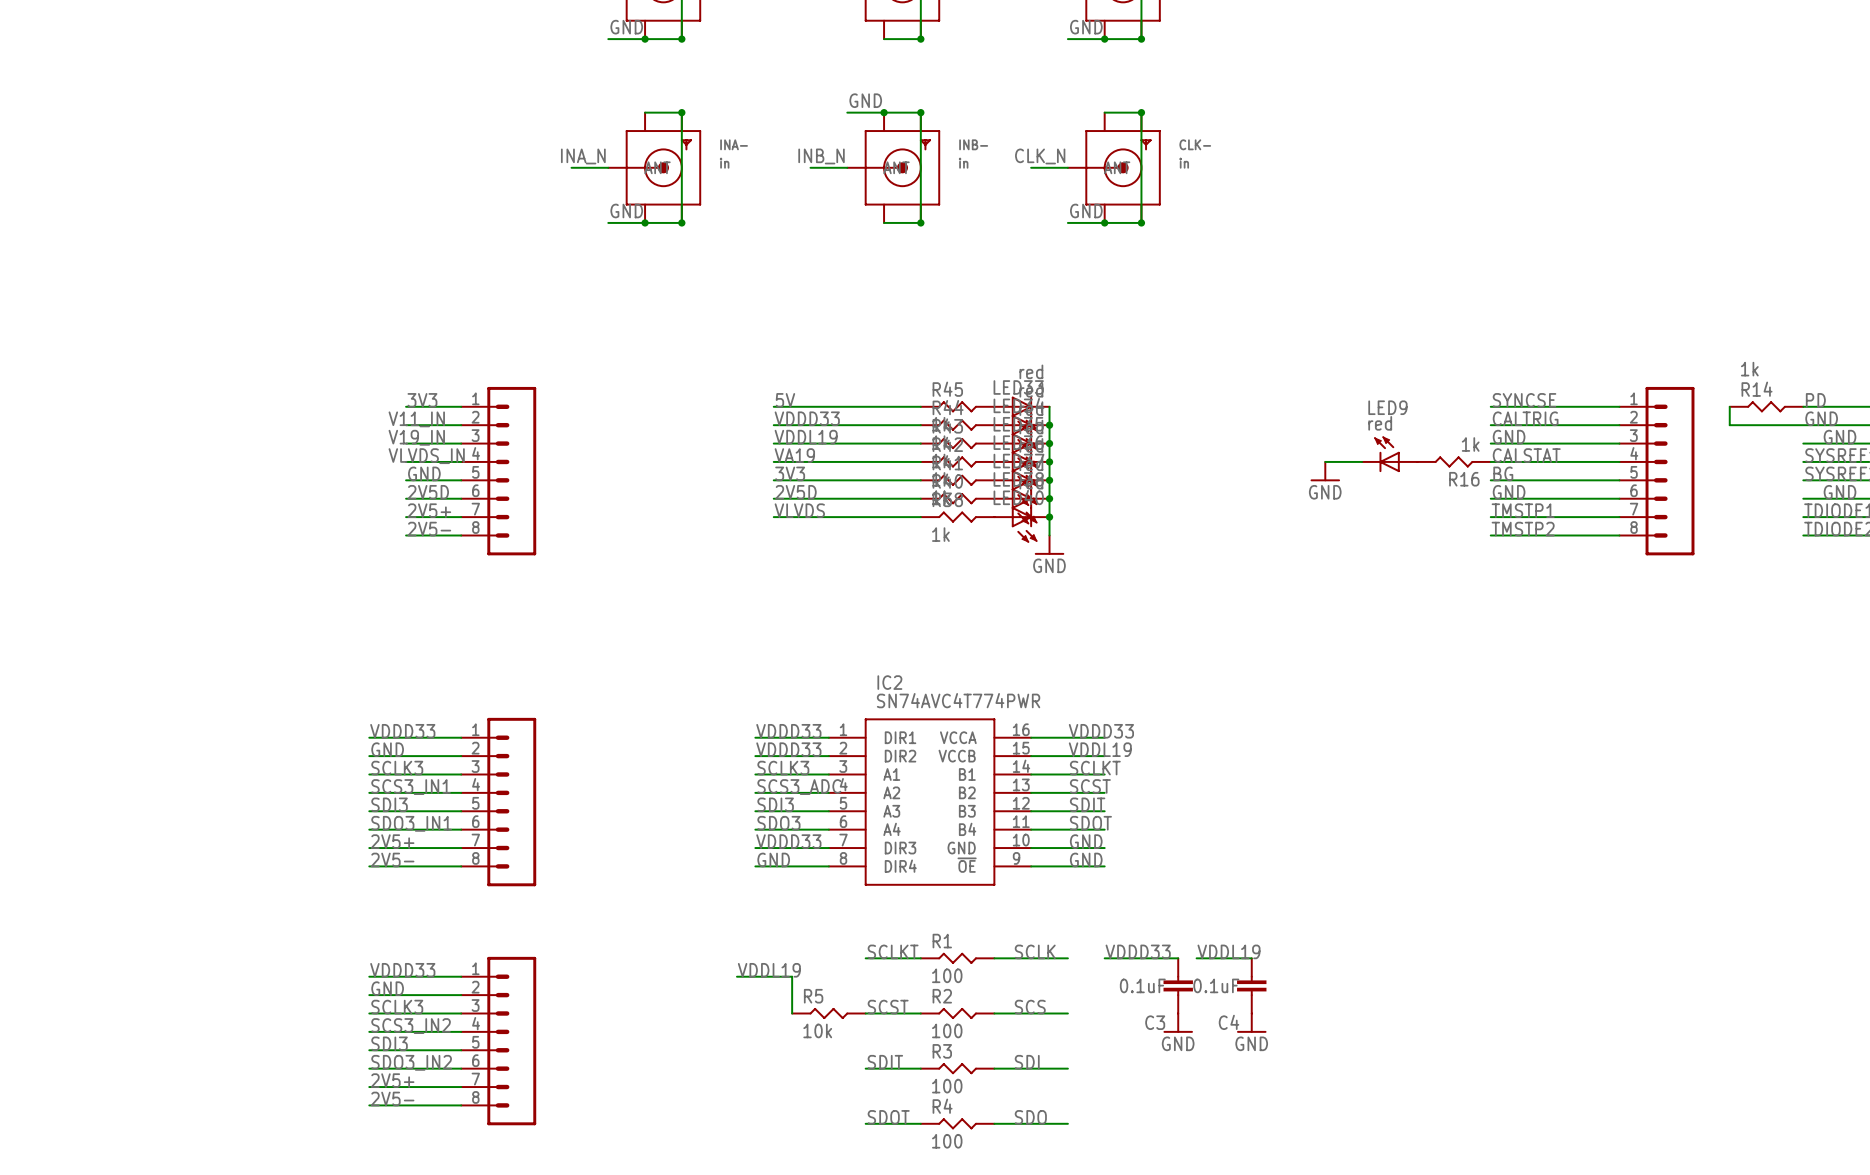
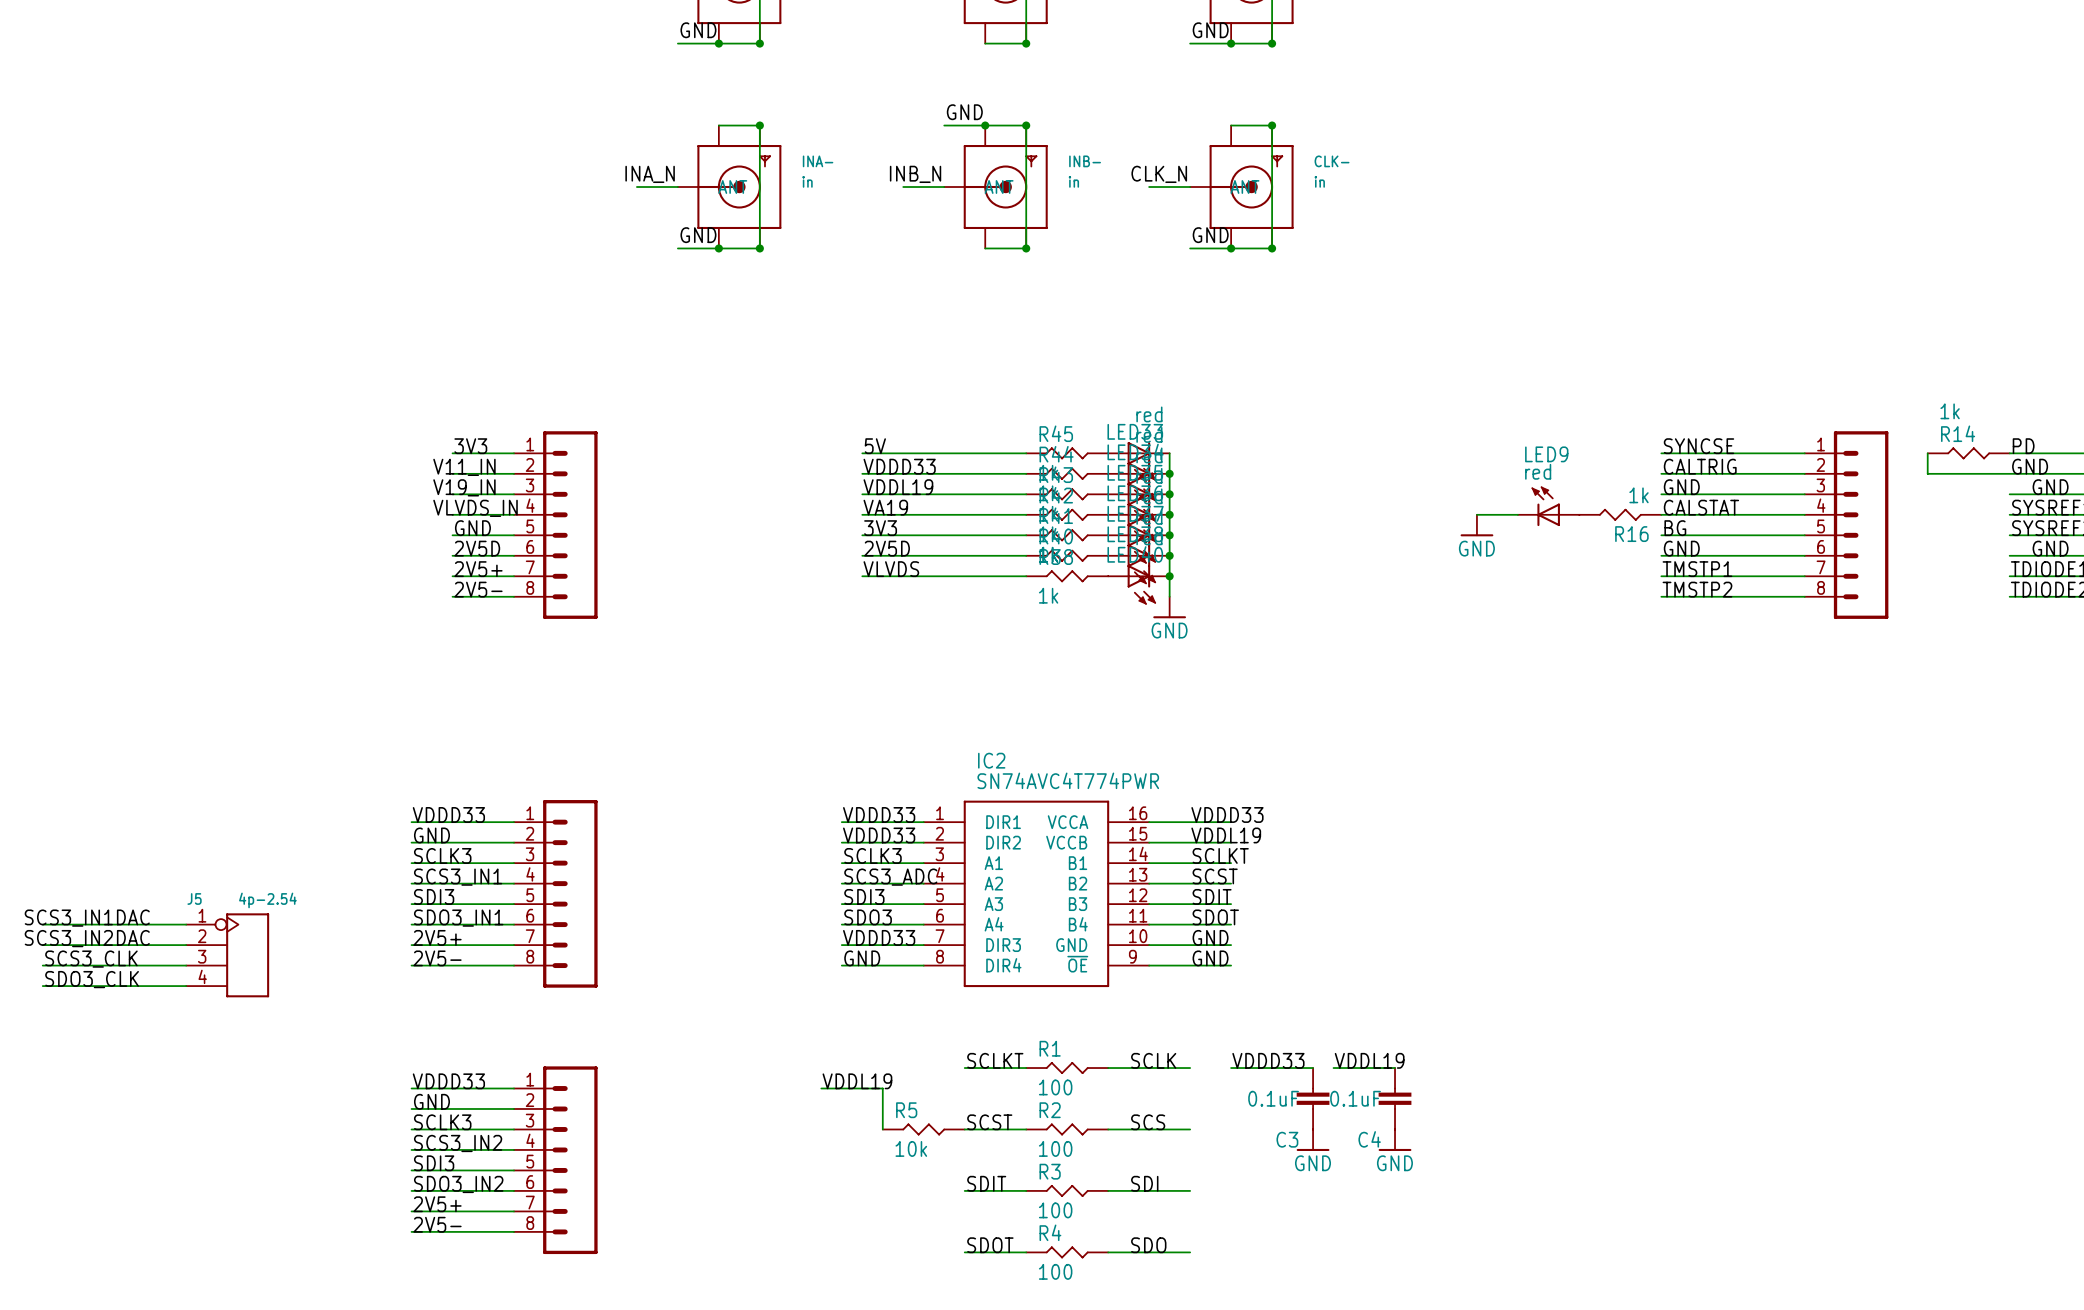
label: none -> SCS3_IN1DAC (87, 918)
wire: none -> (42, 924) (186, 924)
label: none -> SCS3_IN2DAC (87, 938)
wire: none -> (42, 945) (186, 945)
J5: none -> 4p-2.54 (227, 955)
label: none -> SCS3_CLK (91, 959)
wire: none -> (42, 965) (186, 965)
label: none -> SDO3_CLK (92, 979)
wire: none -> (42, 986) (186, 986)

